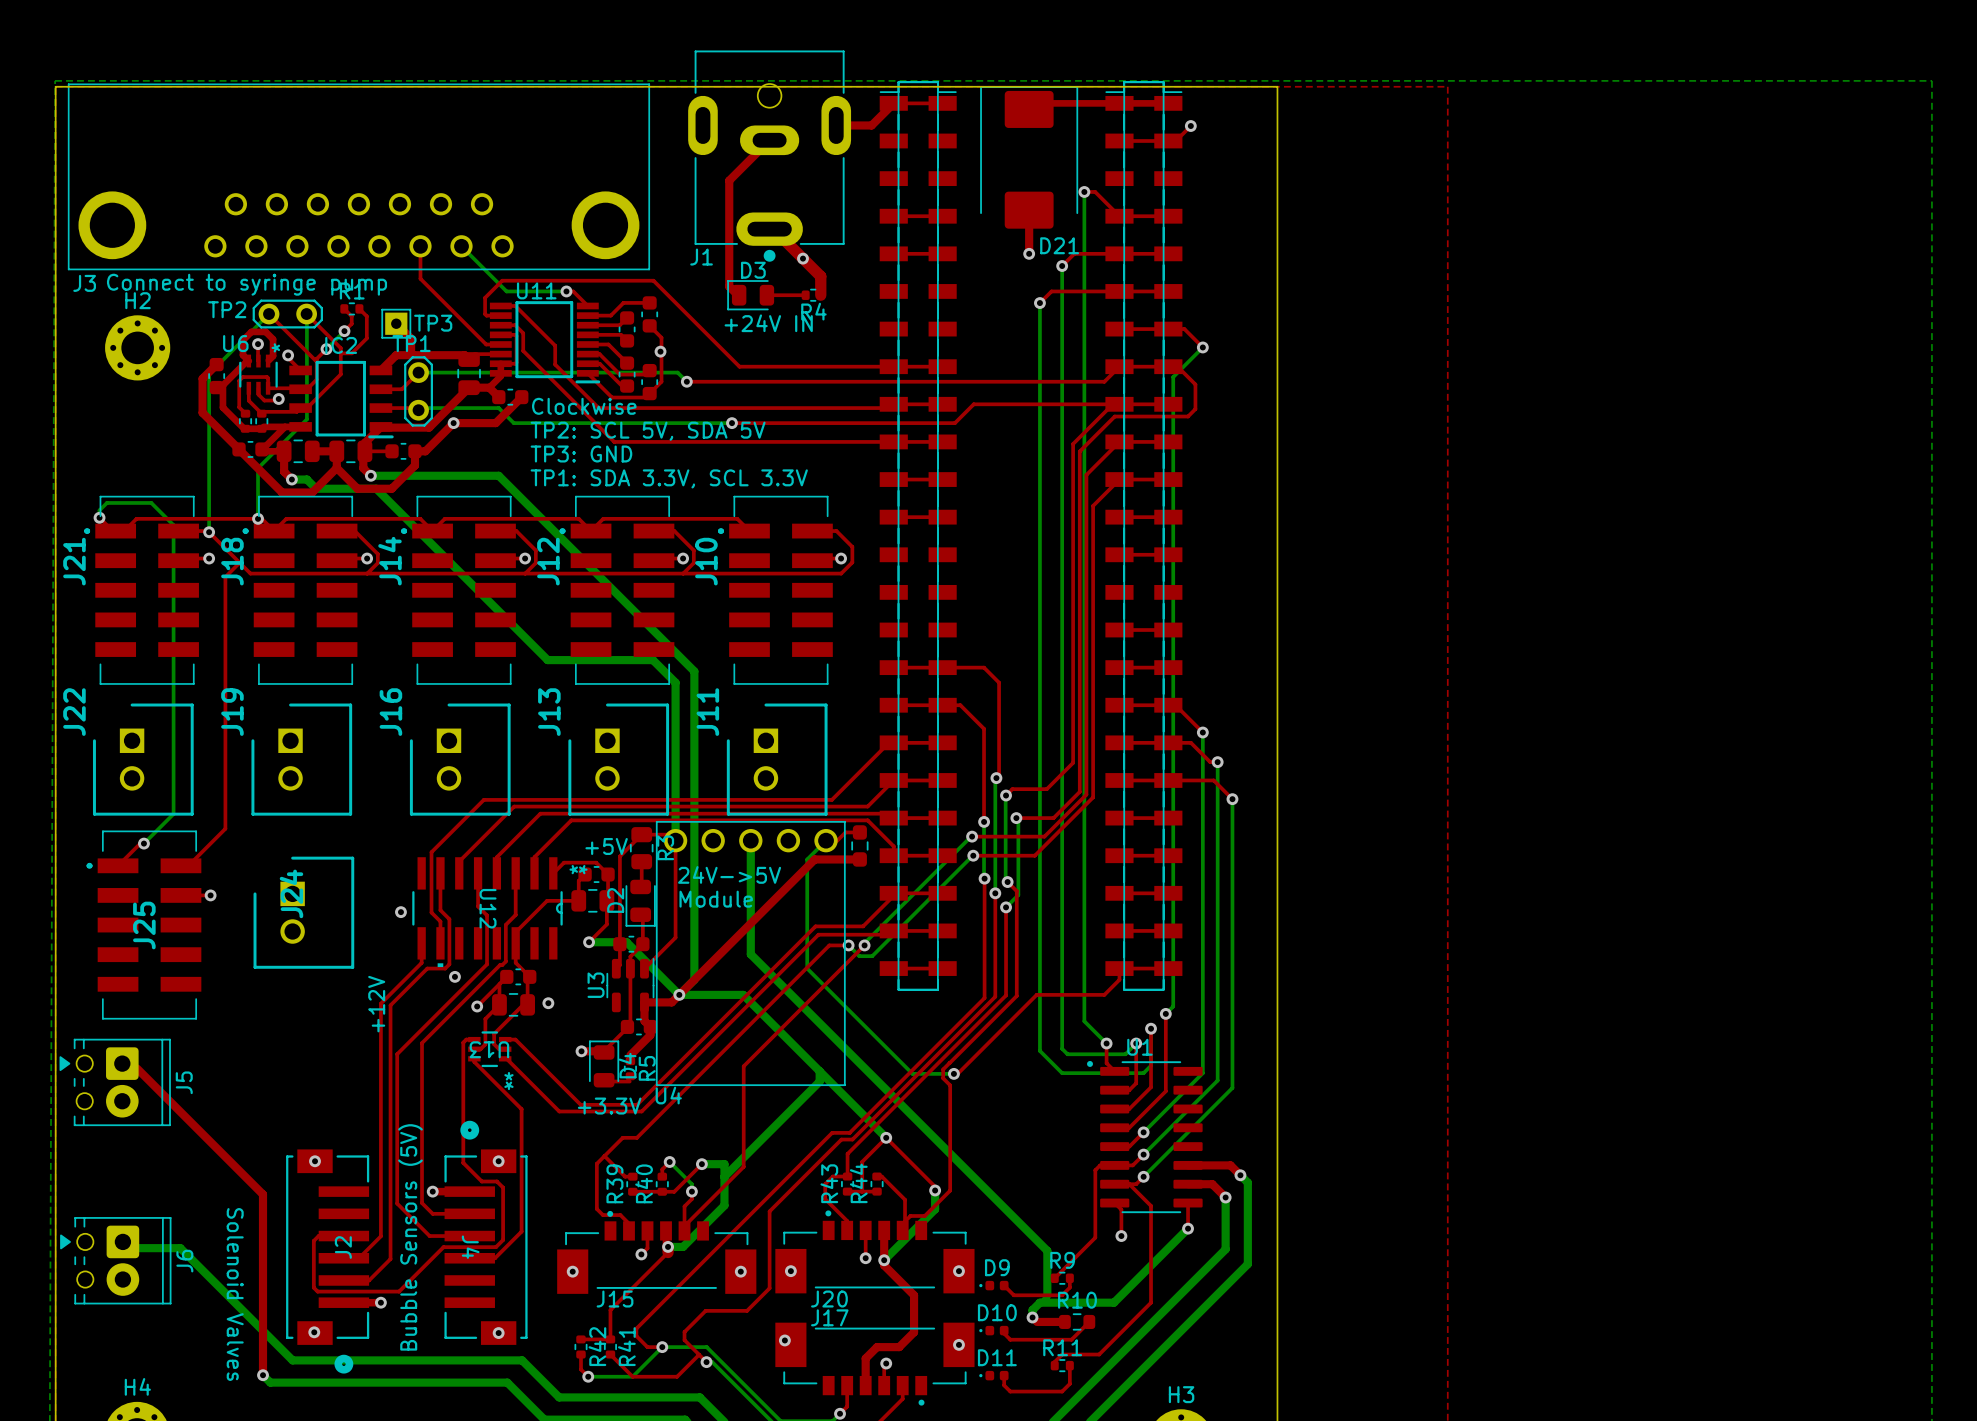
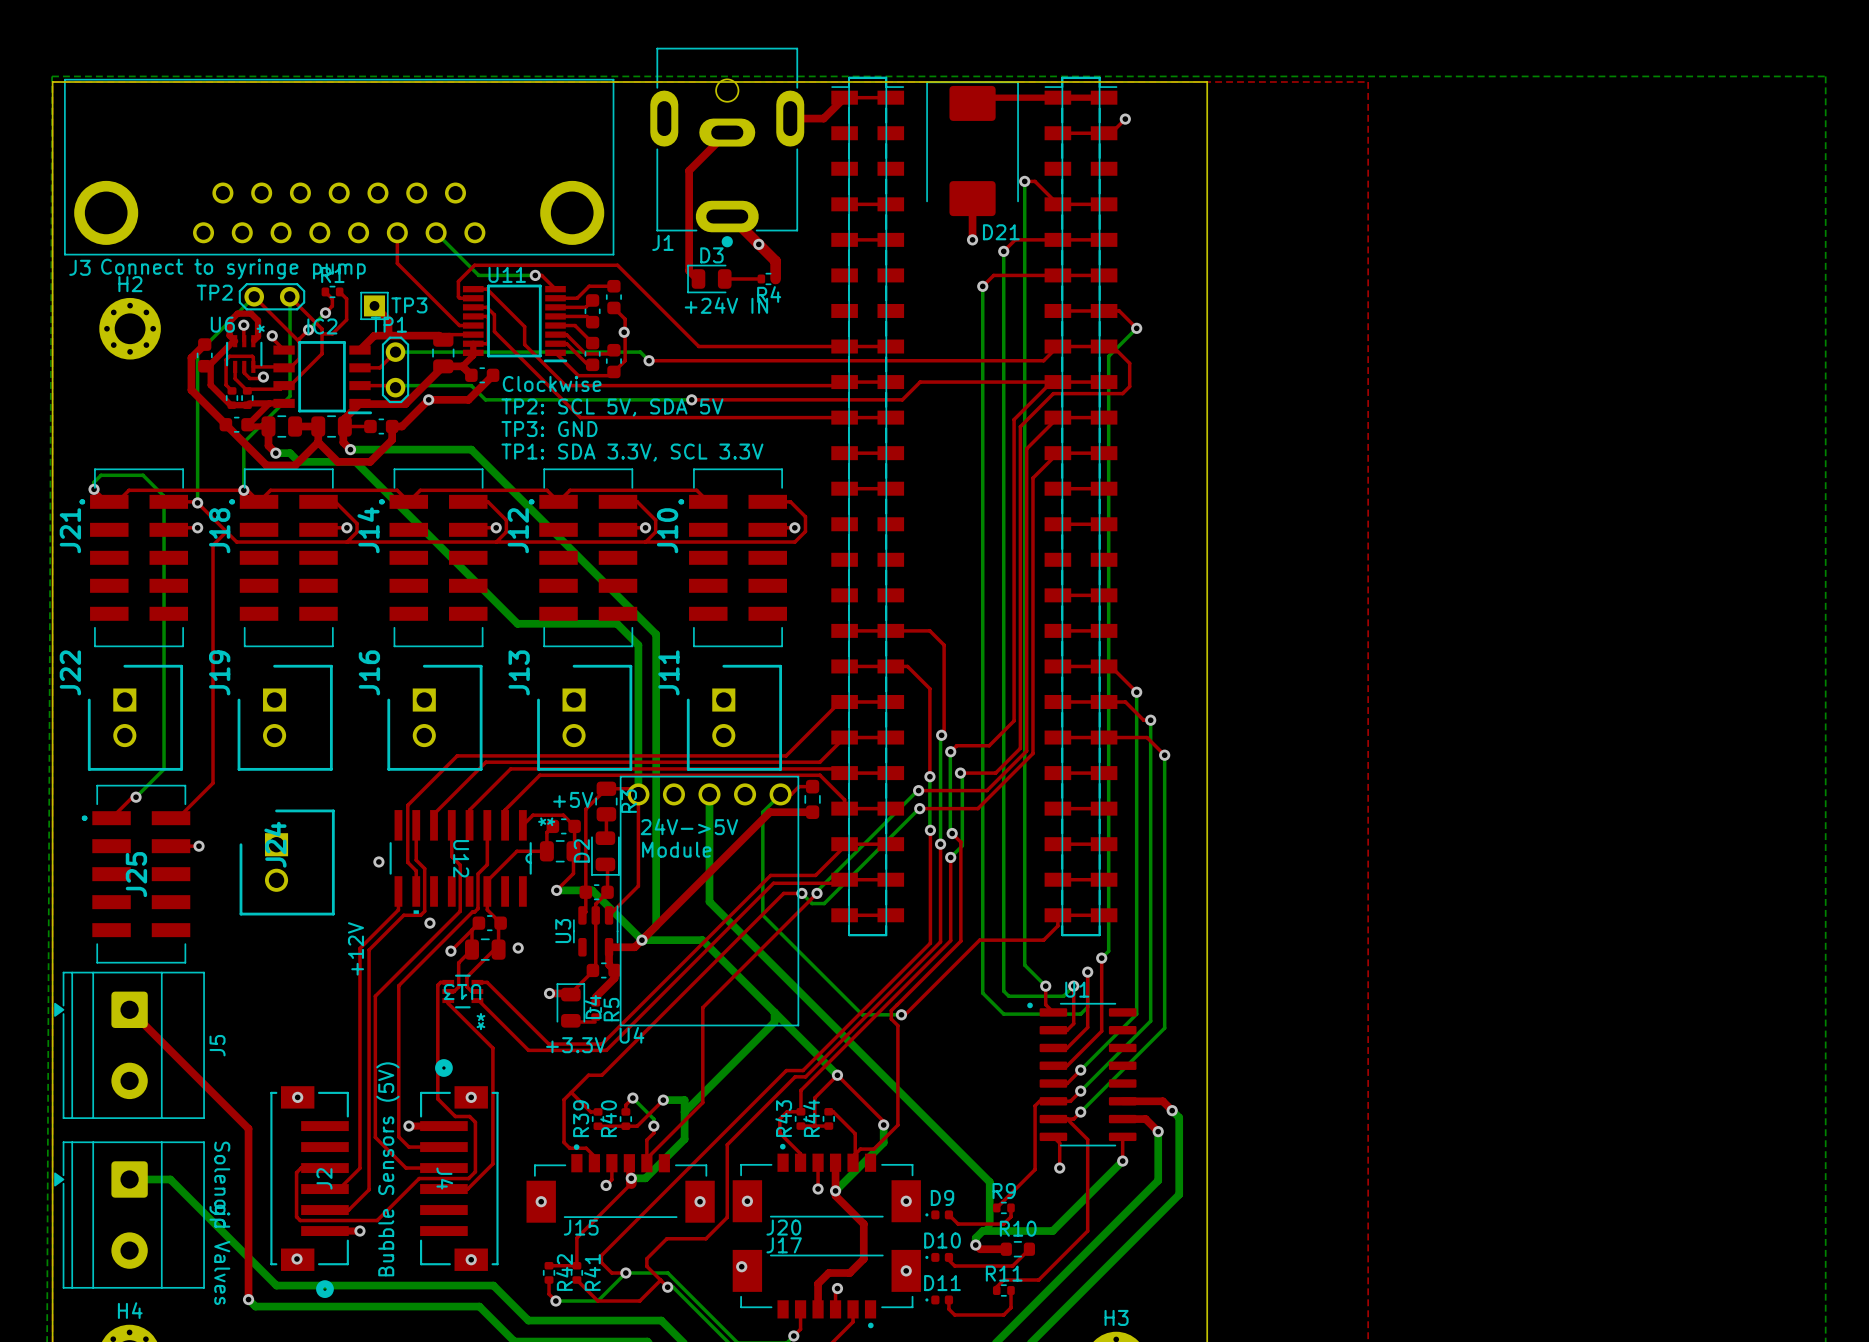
J5 footprint: [59, 1038, 171, 1127] -> [54, 971, 205, 1119]
J6 footprint: [60, 1217, 172, 1305] -> [54, 1141, 205, 1289]

